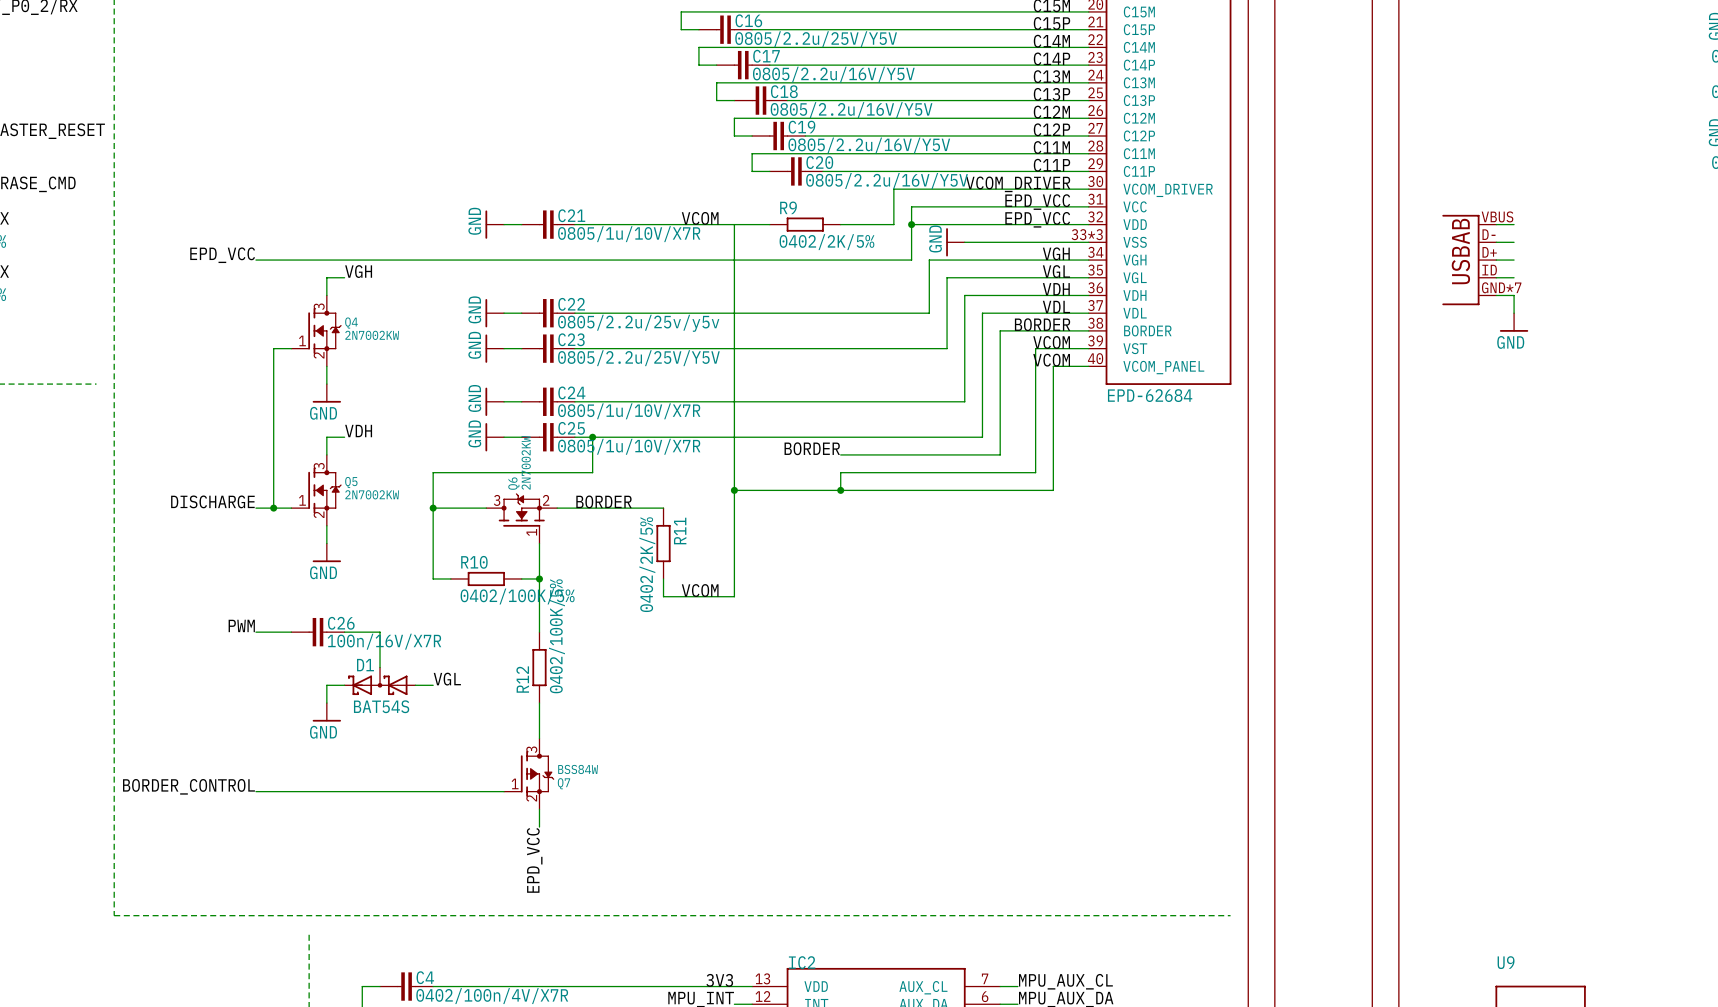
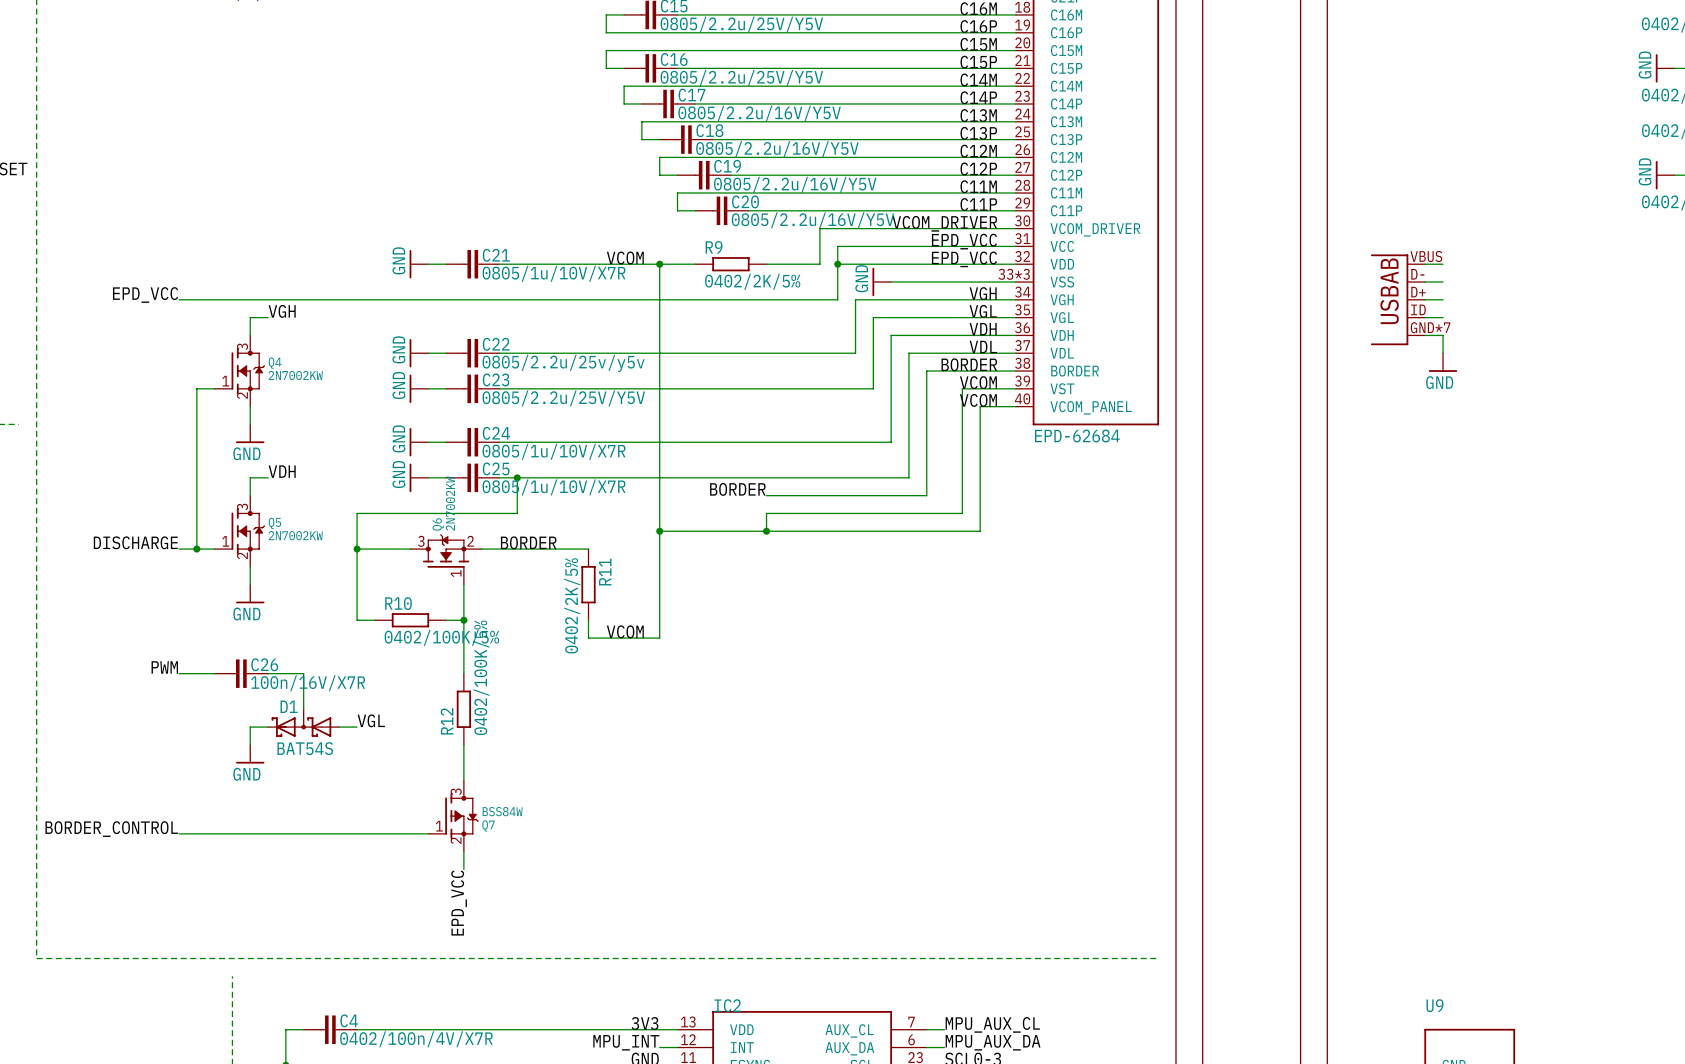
junction: none -> (659, 264)

